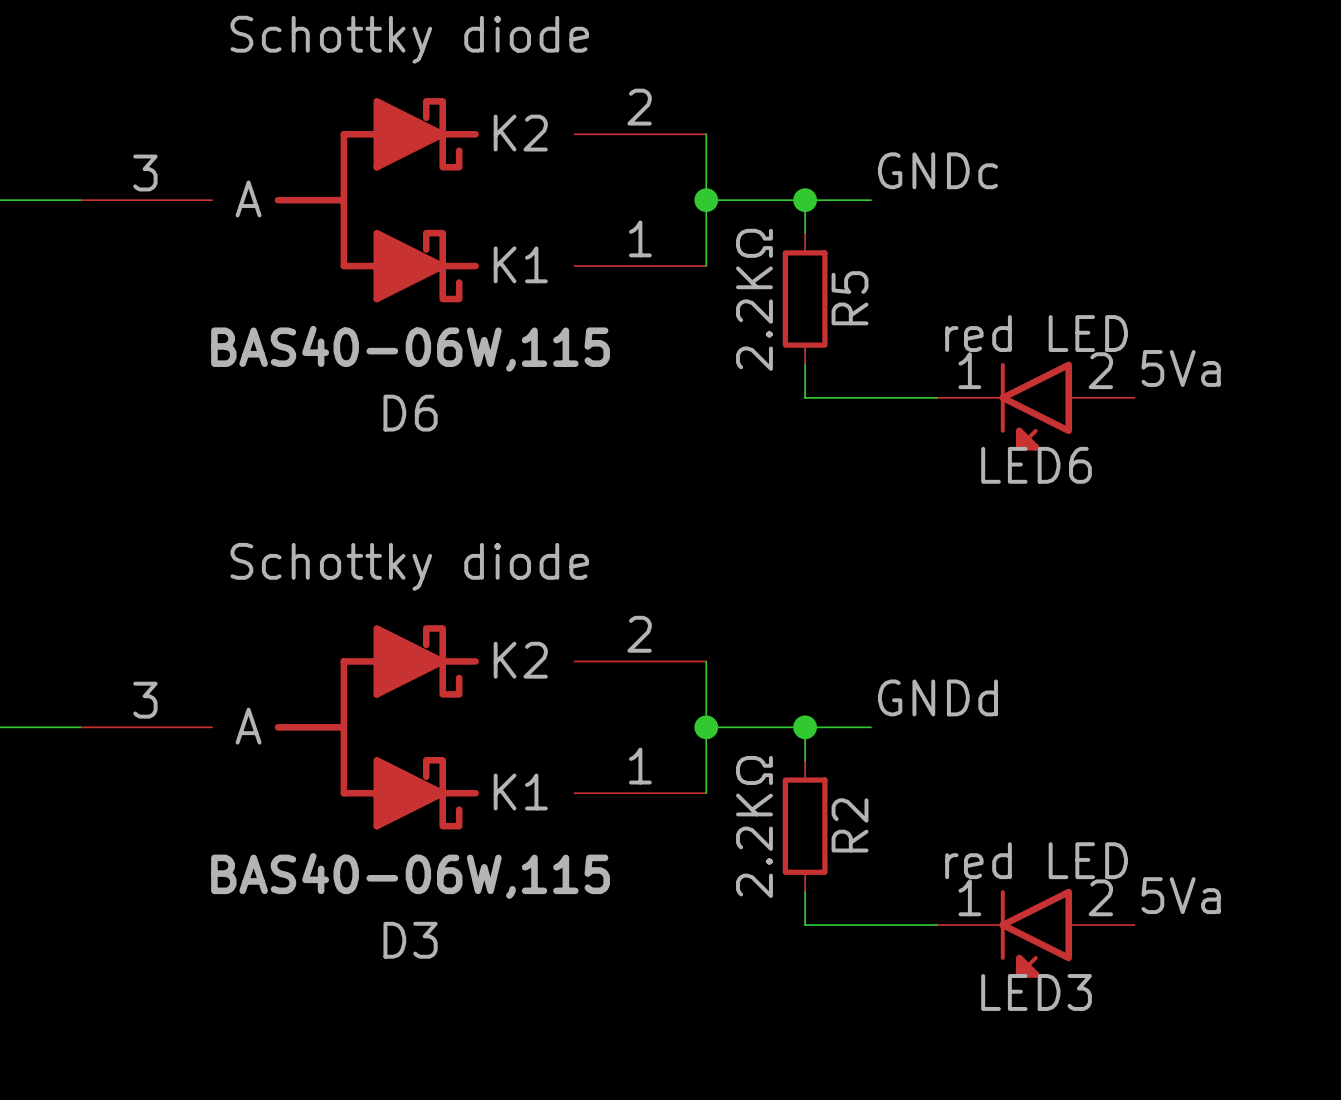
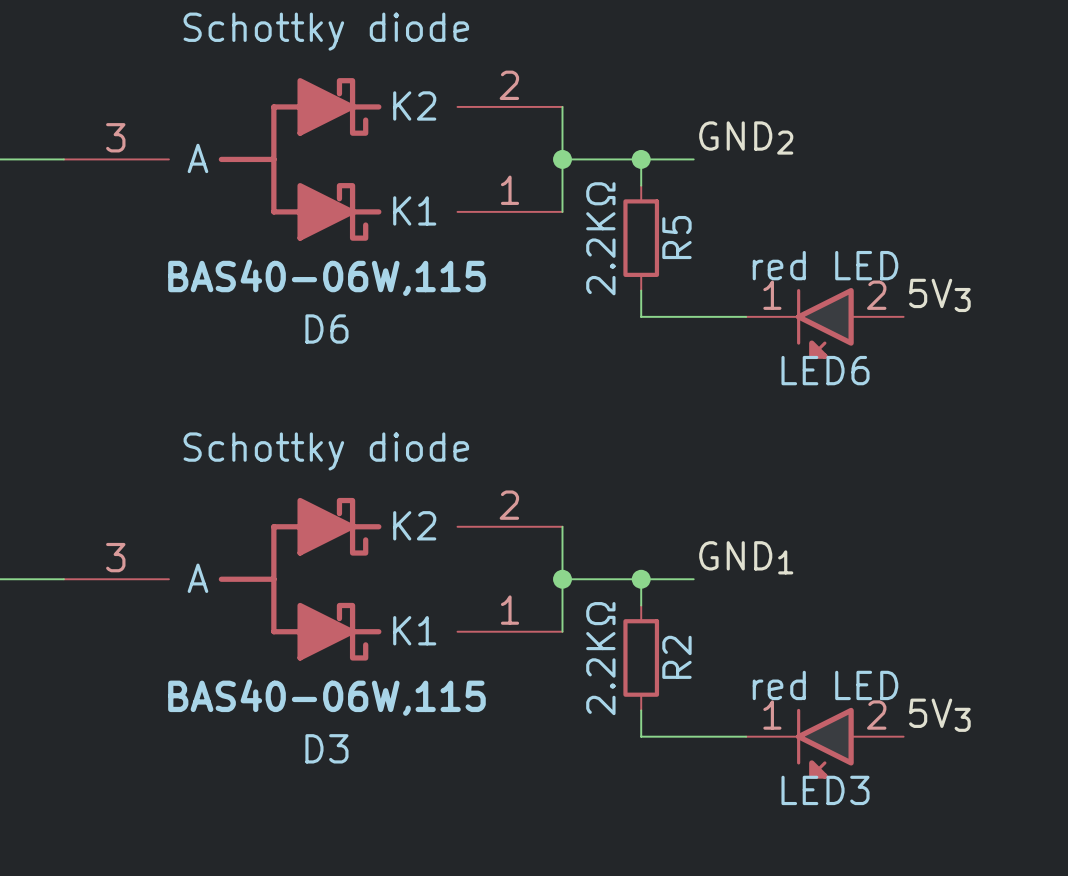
label: GNDc (937, 170) -> GND2 (746, 137)
label: 5Va (1181, 368) -> 5V3 (939, 295)
label: GNDd (937, 697) -> GND1 (746, 557)
label: 5Va (1181, 895) -> 5V3 (939, 715)

